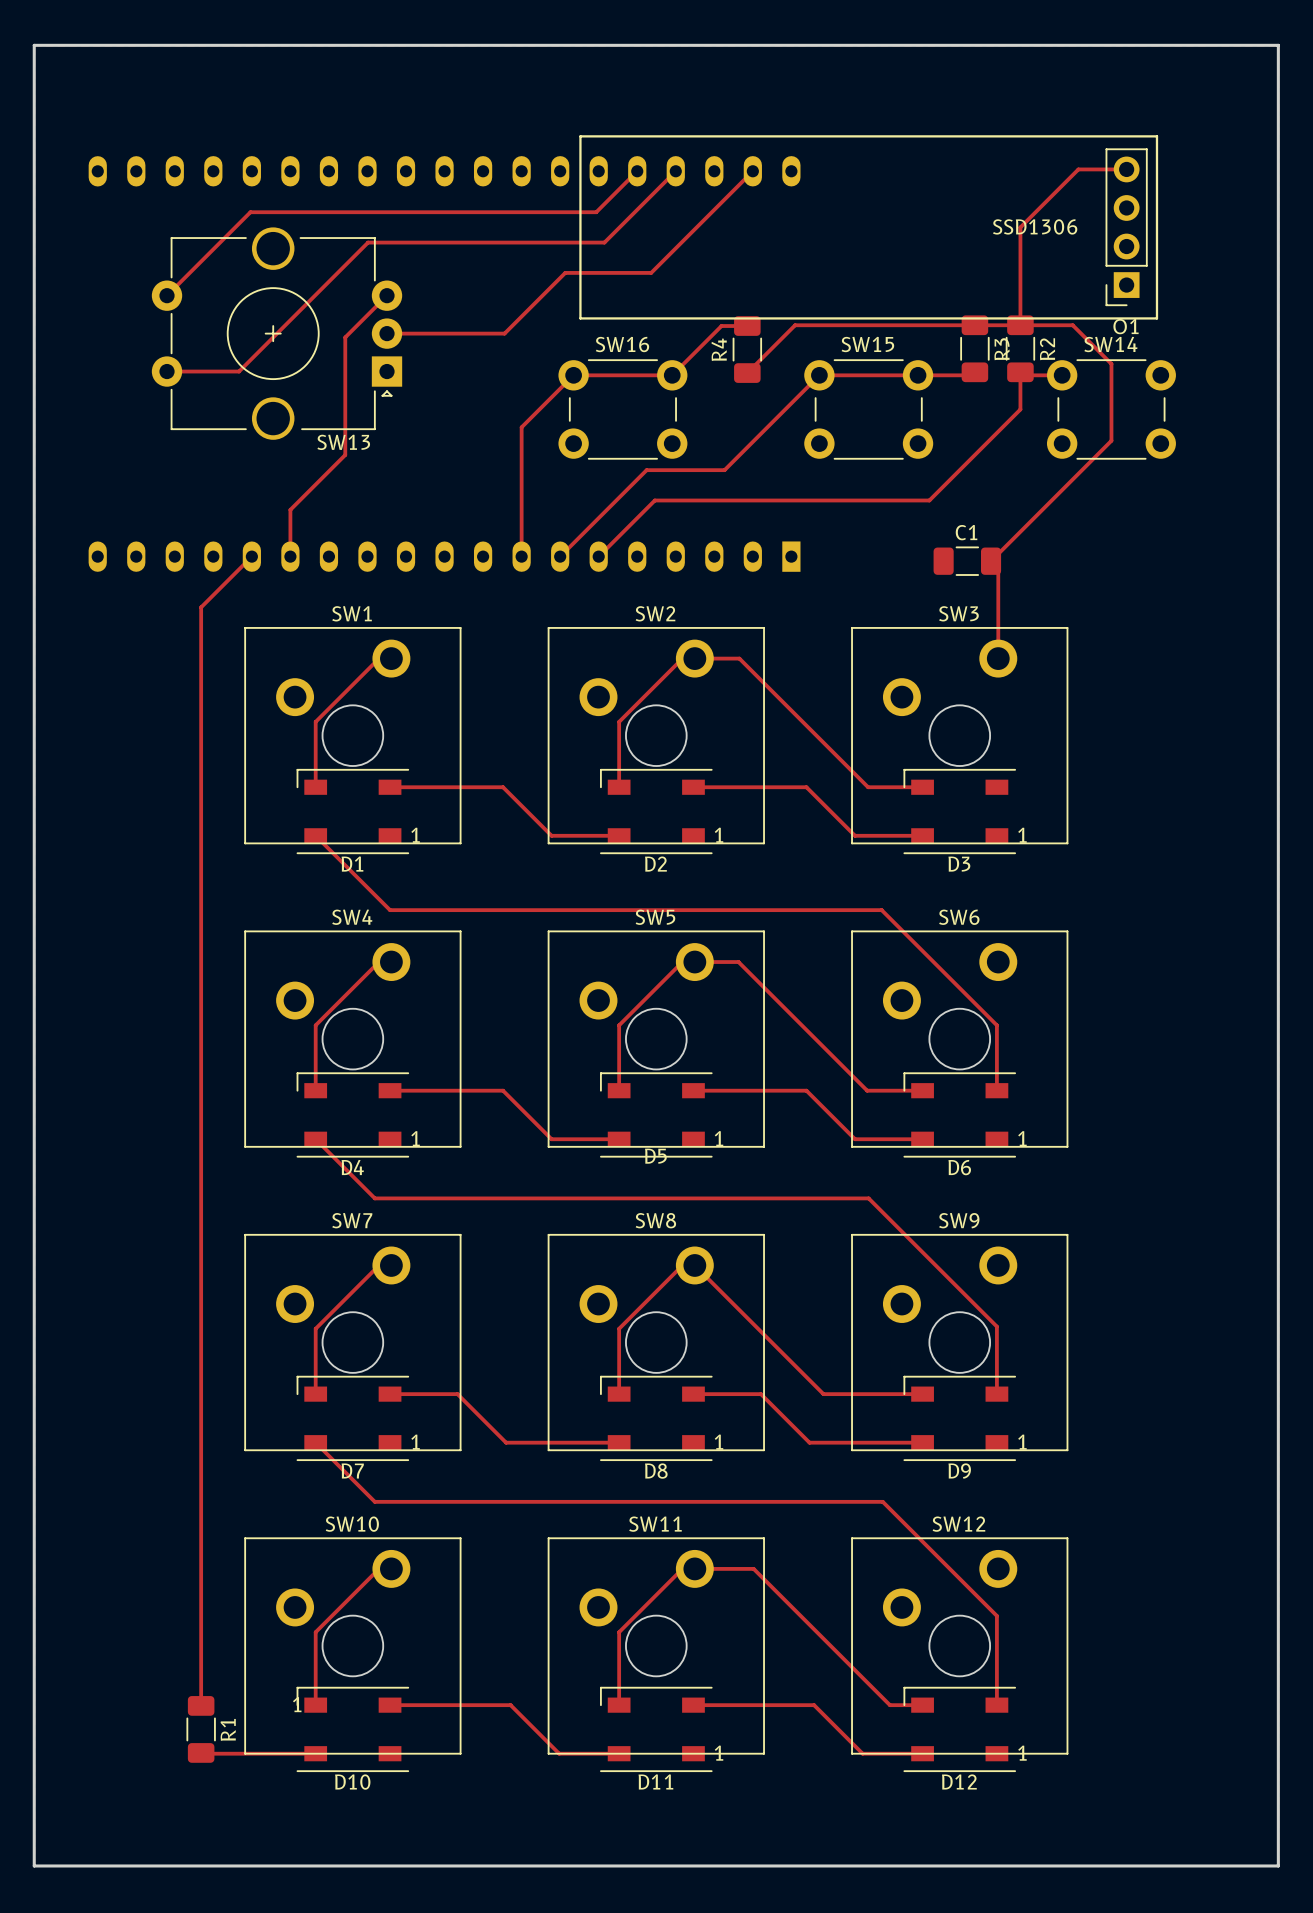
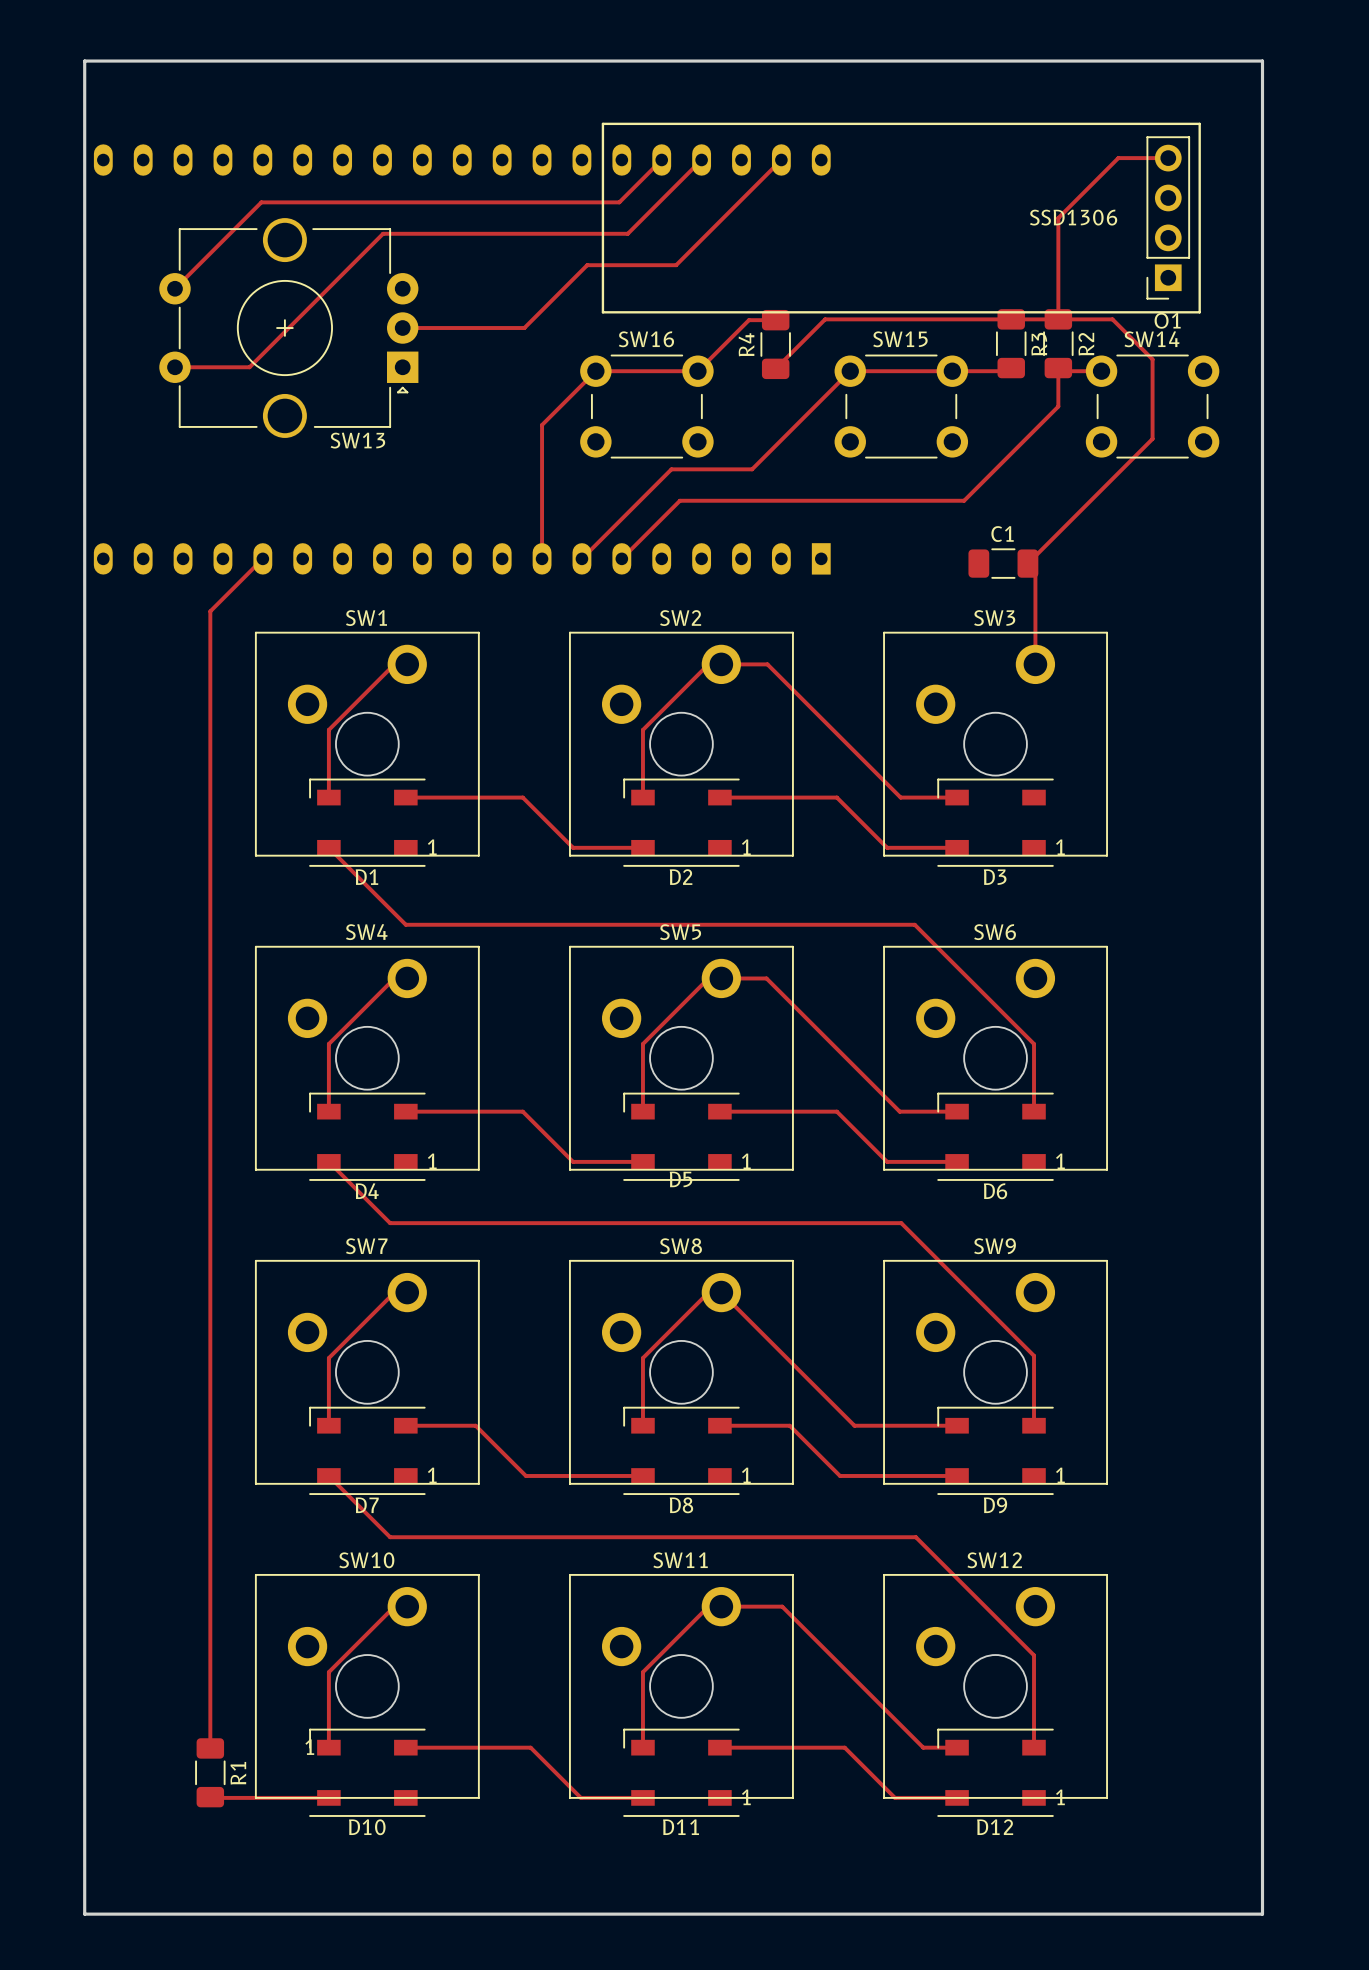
track: (387, 295) (345, 337) (345, 454) (290, 509) (290, 556) -> none
board edge: (79, 1865) (34, 1865) (34, 45) (1278, 45) (1278, 1865) (1217, 1865) -> (84, 1914) (84, 61) (1262, 61) (1262, 1914)

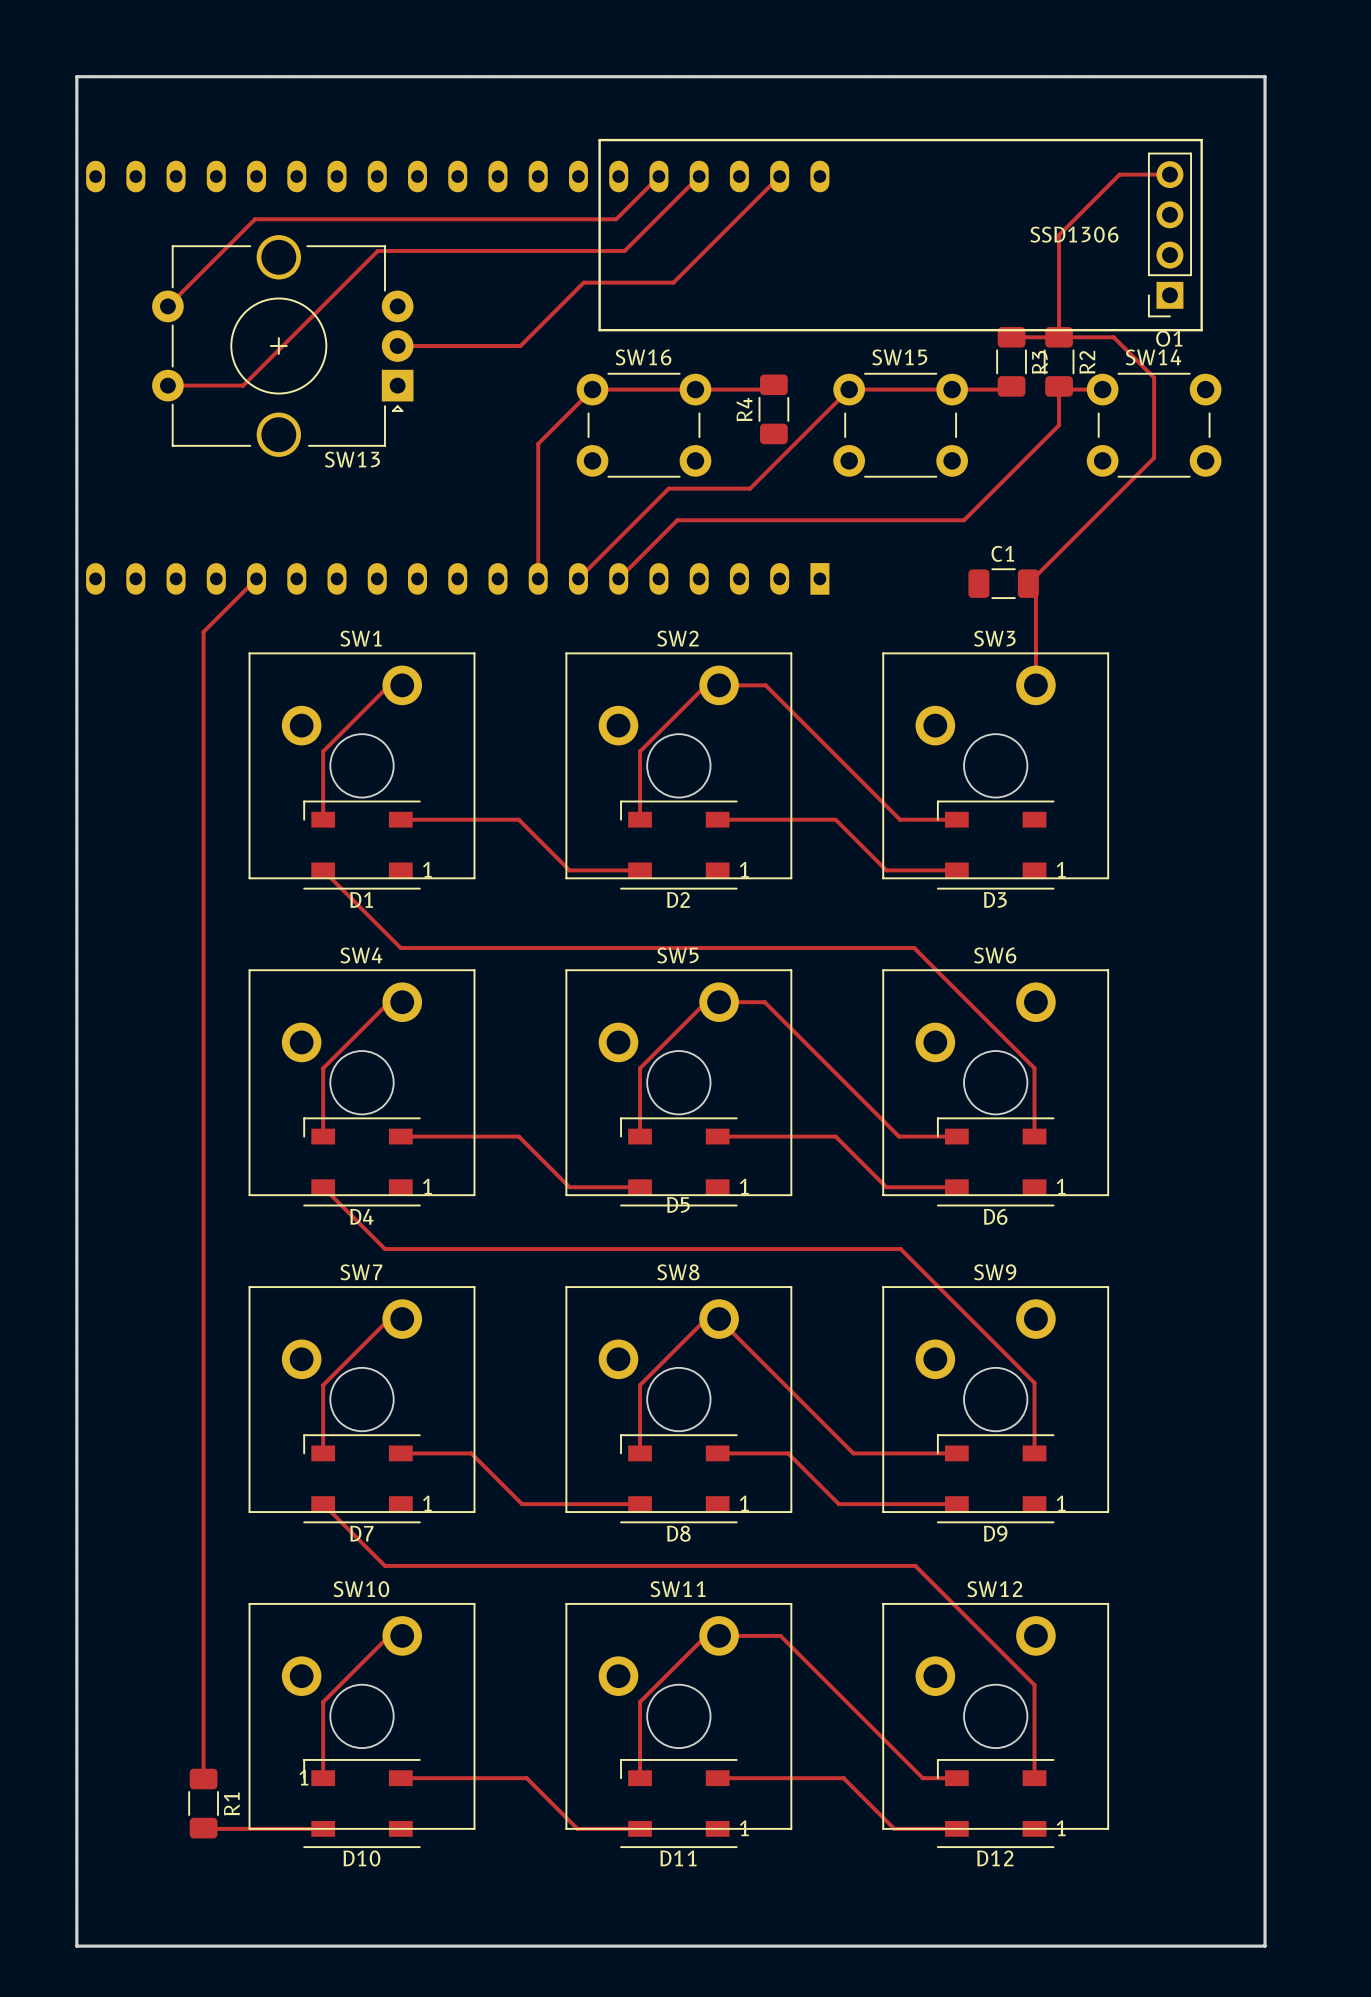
track: (1011, 319) (825, 319) (775, 368) -> none
track: (775, 320) (748, 320) (697, 371) -> (773, 384) (769, 389) (695, 389)
R4 position: (775, 344) -> (773, 409)

